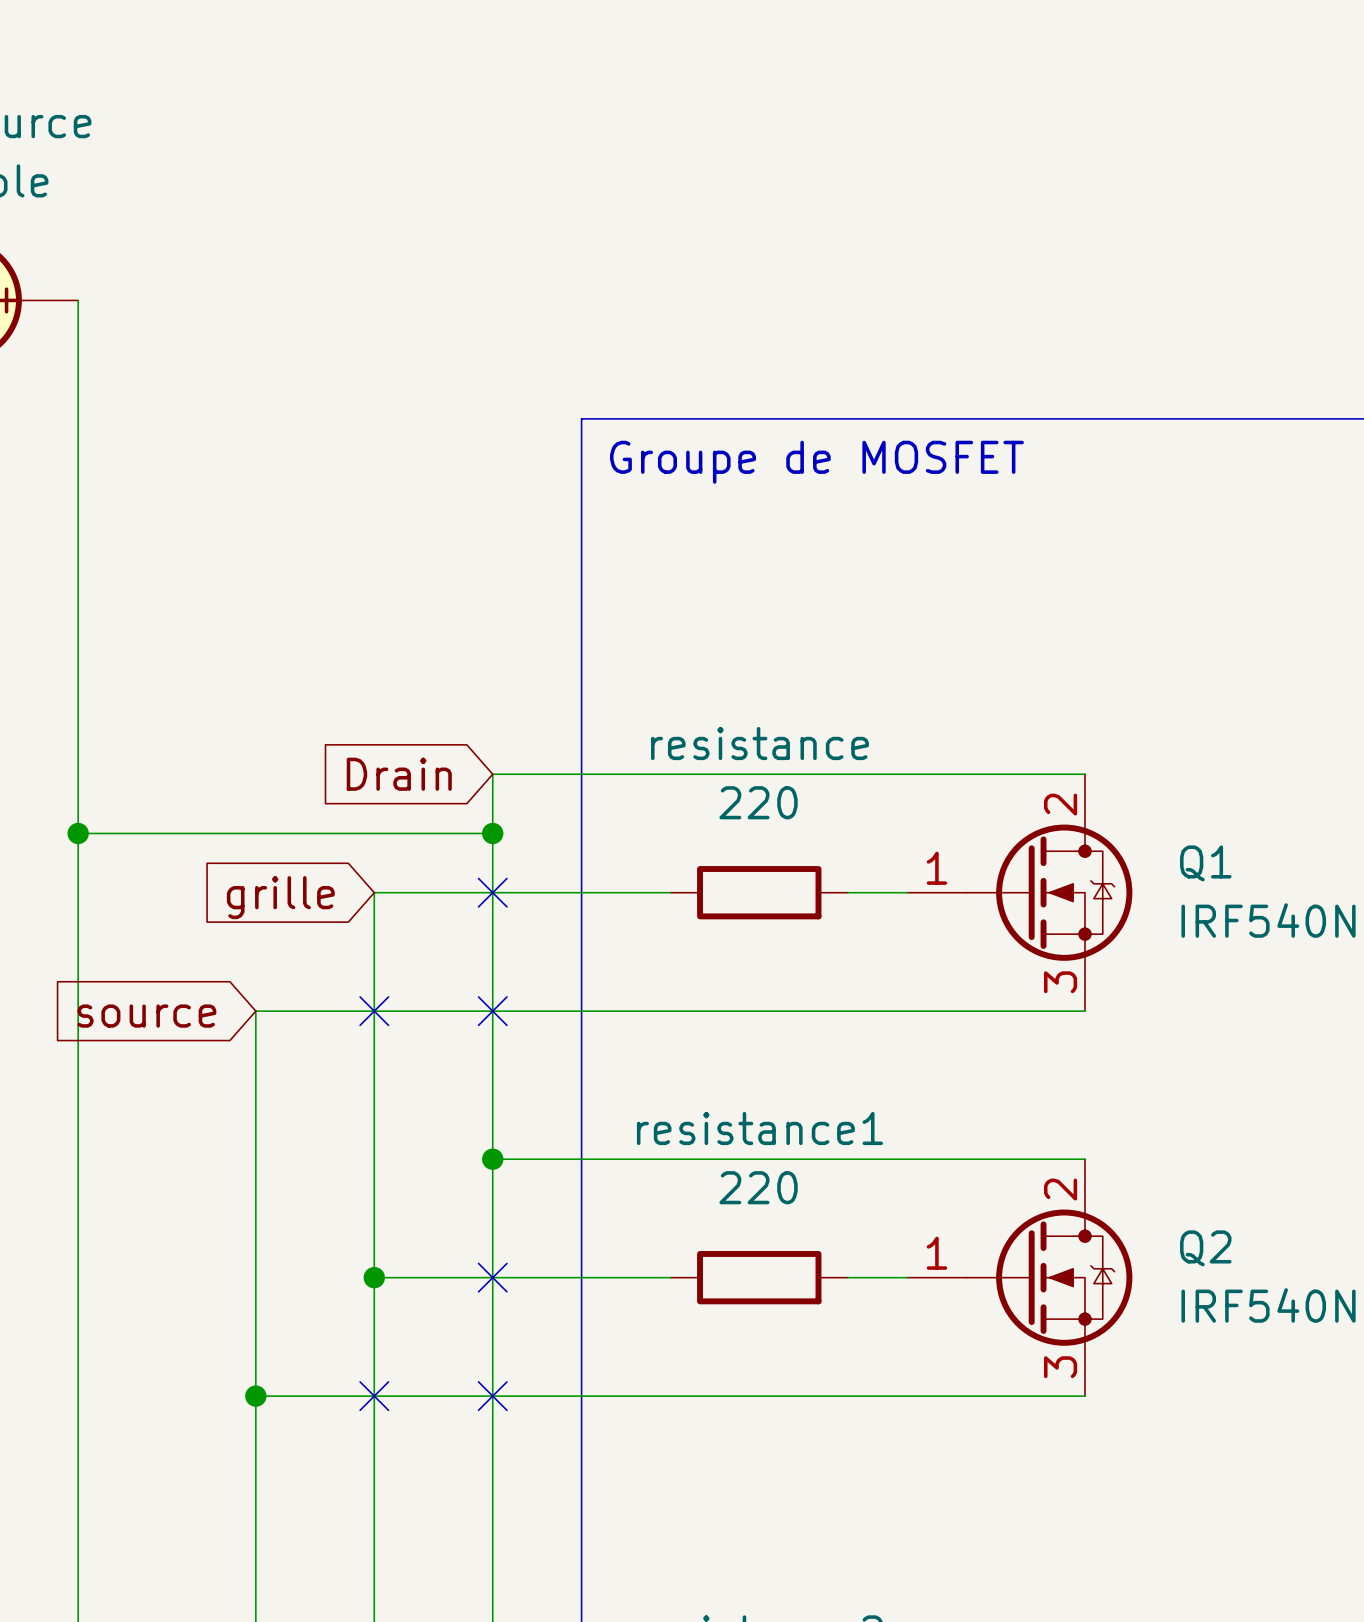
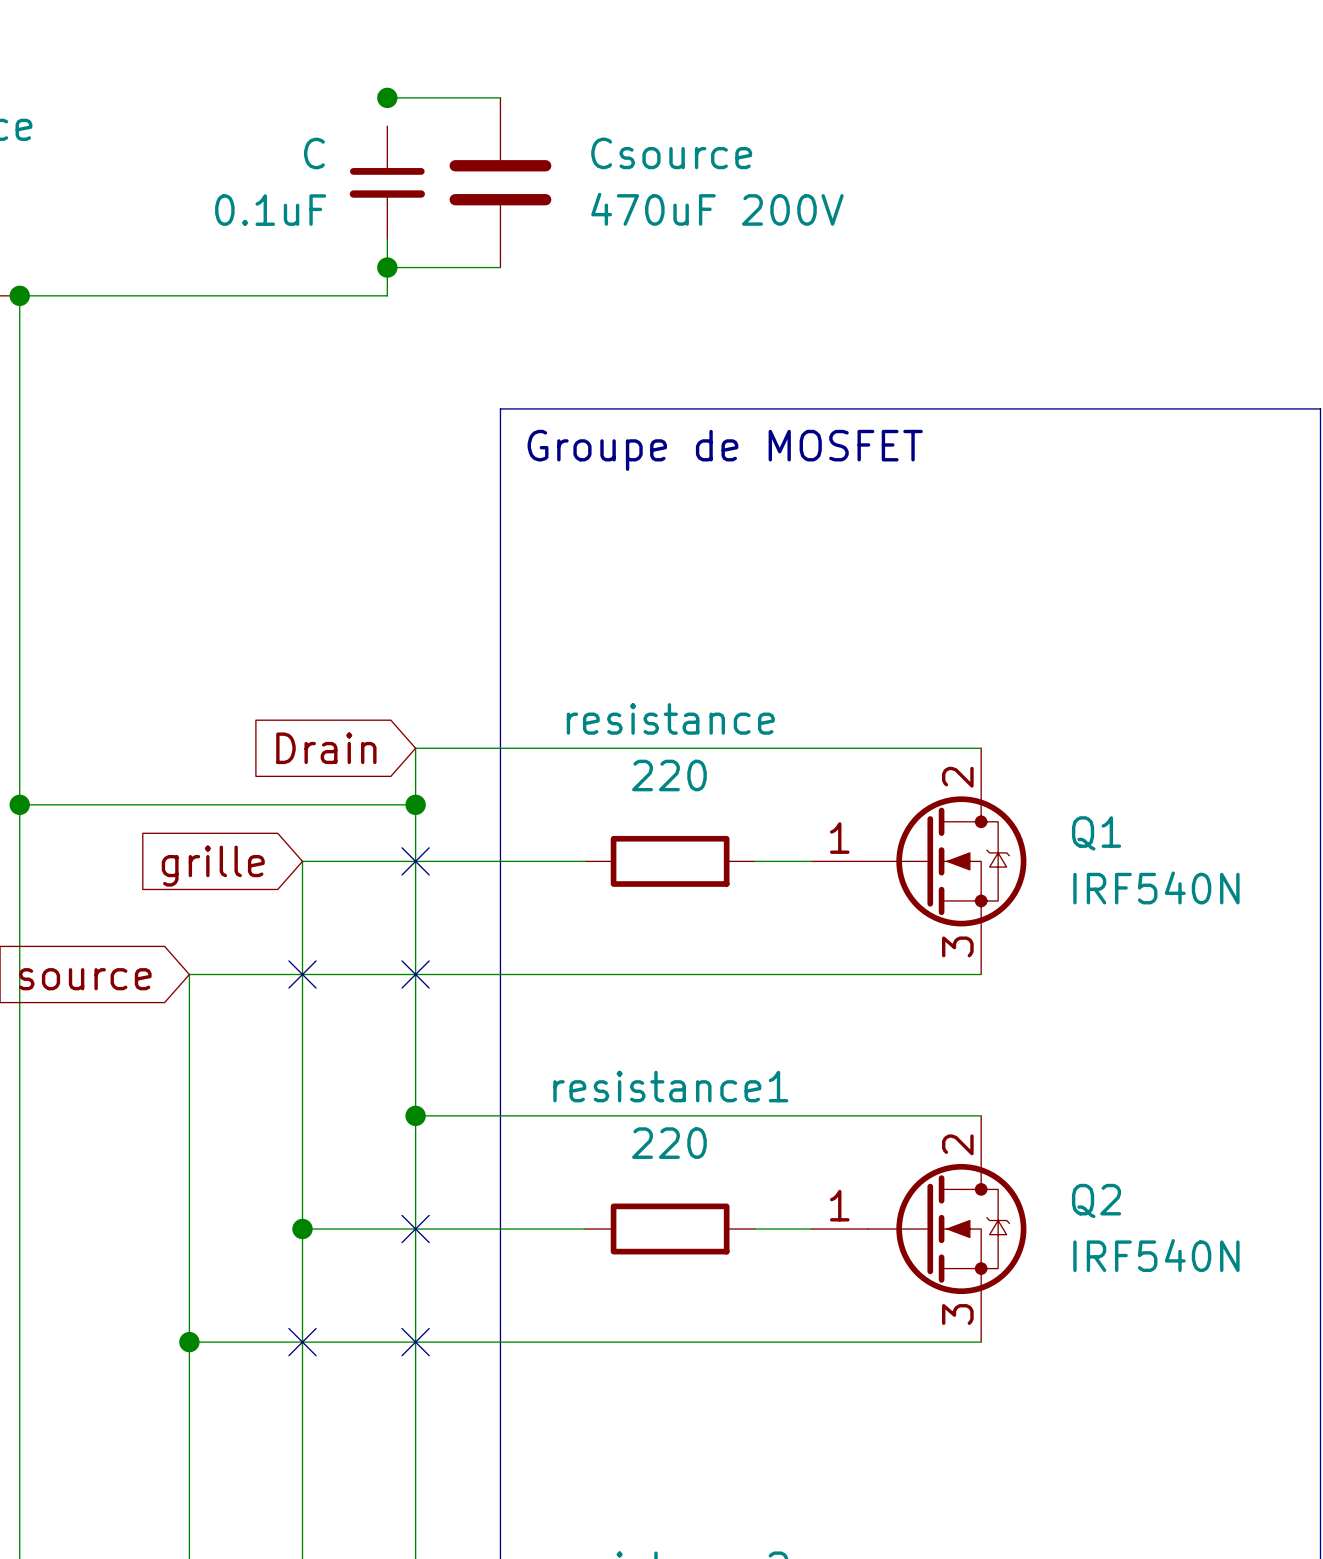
wire: none -> (387, 97) (500, 97)
junction: none -> (387, 97)
C: none -> 0.1uF (387, 182)
Csource: none -> 470uF 200V (500, 182)
wire: none -> (387, 239) (387, 295) (19, 295)
wire: none -> (387, 267) (500, 267)
junction: none -> (387, 267)
junction: none -> (19, 295)

